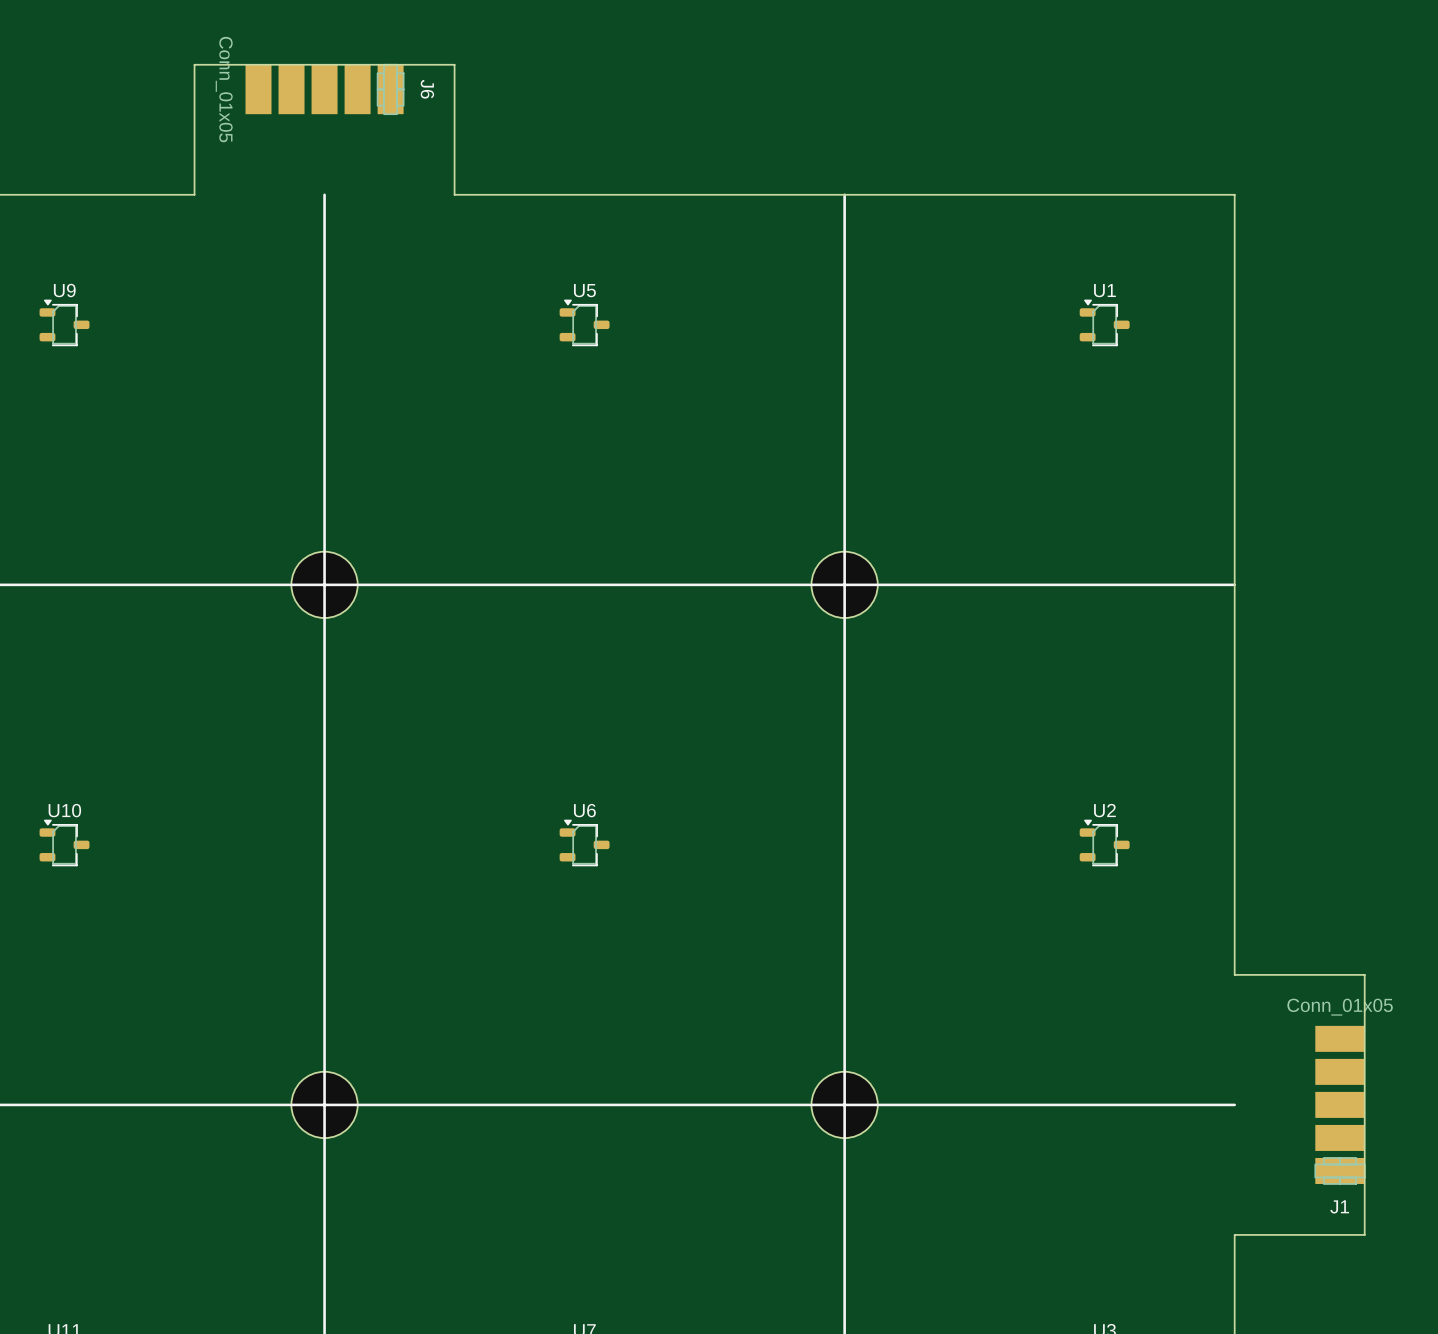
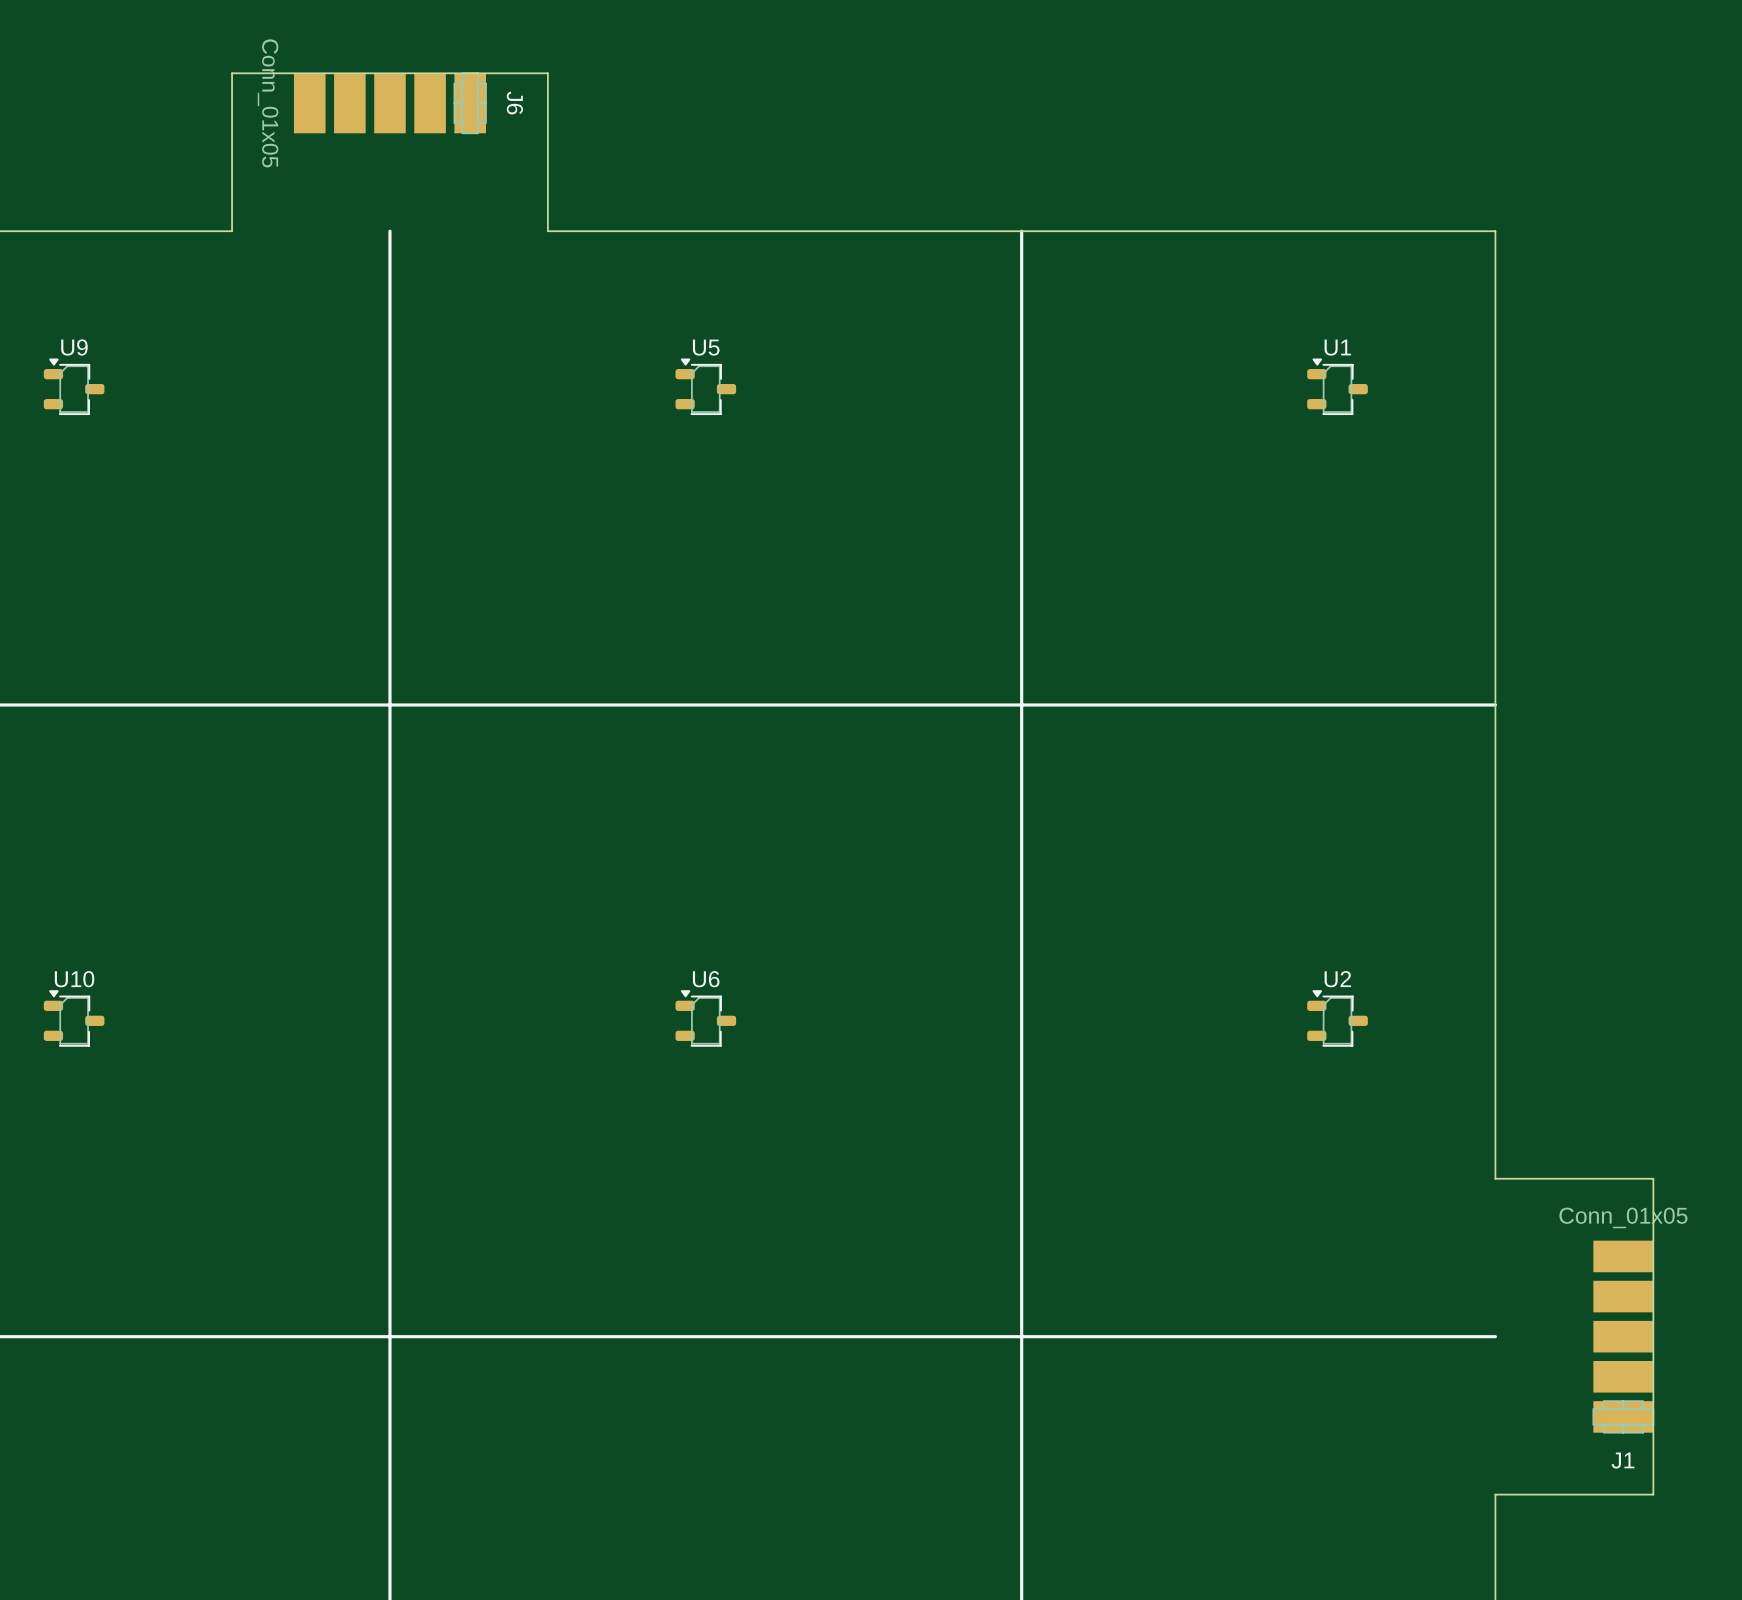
part: (324, 584) -> none
part: (844, 584) -> none
part: (324, 1104) -> none
part: (844, 1104) -> none

